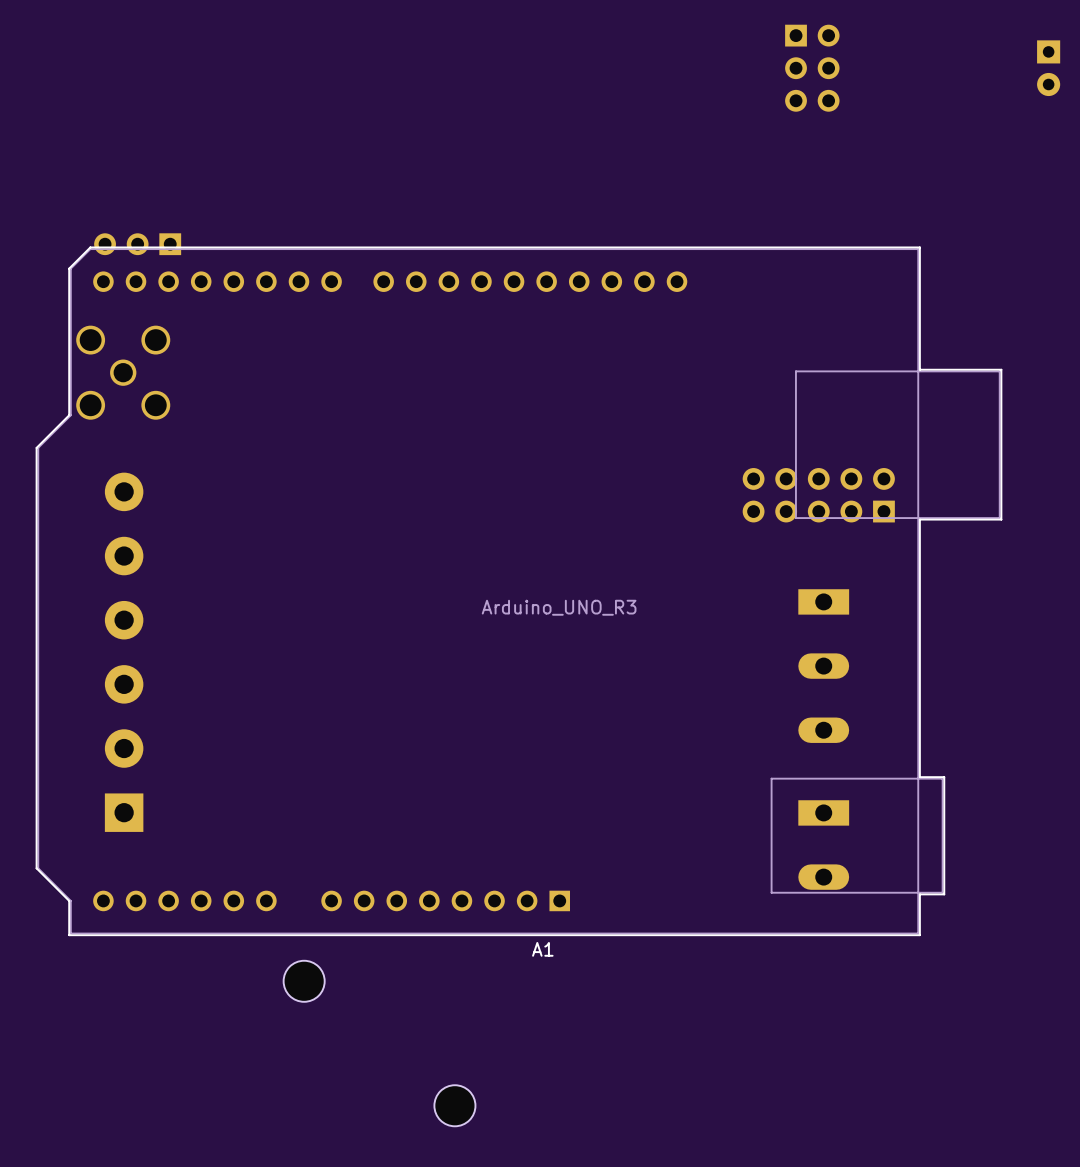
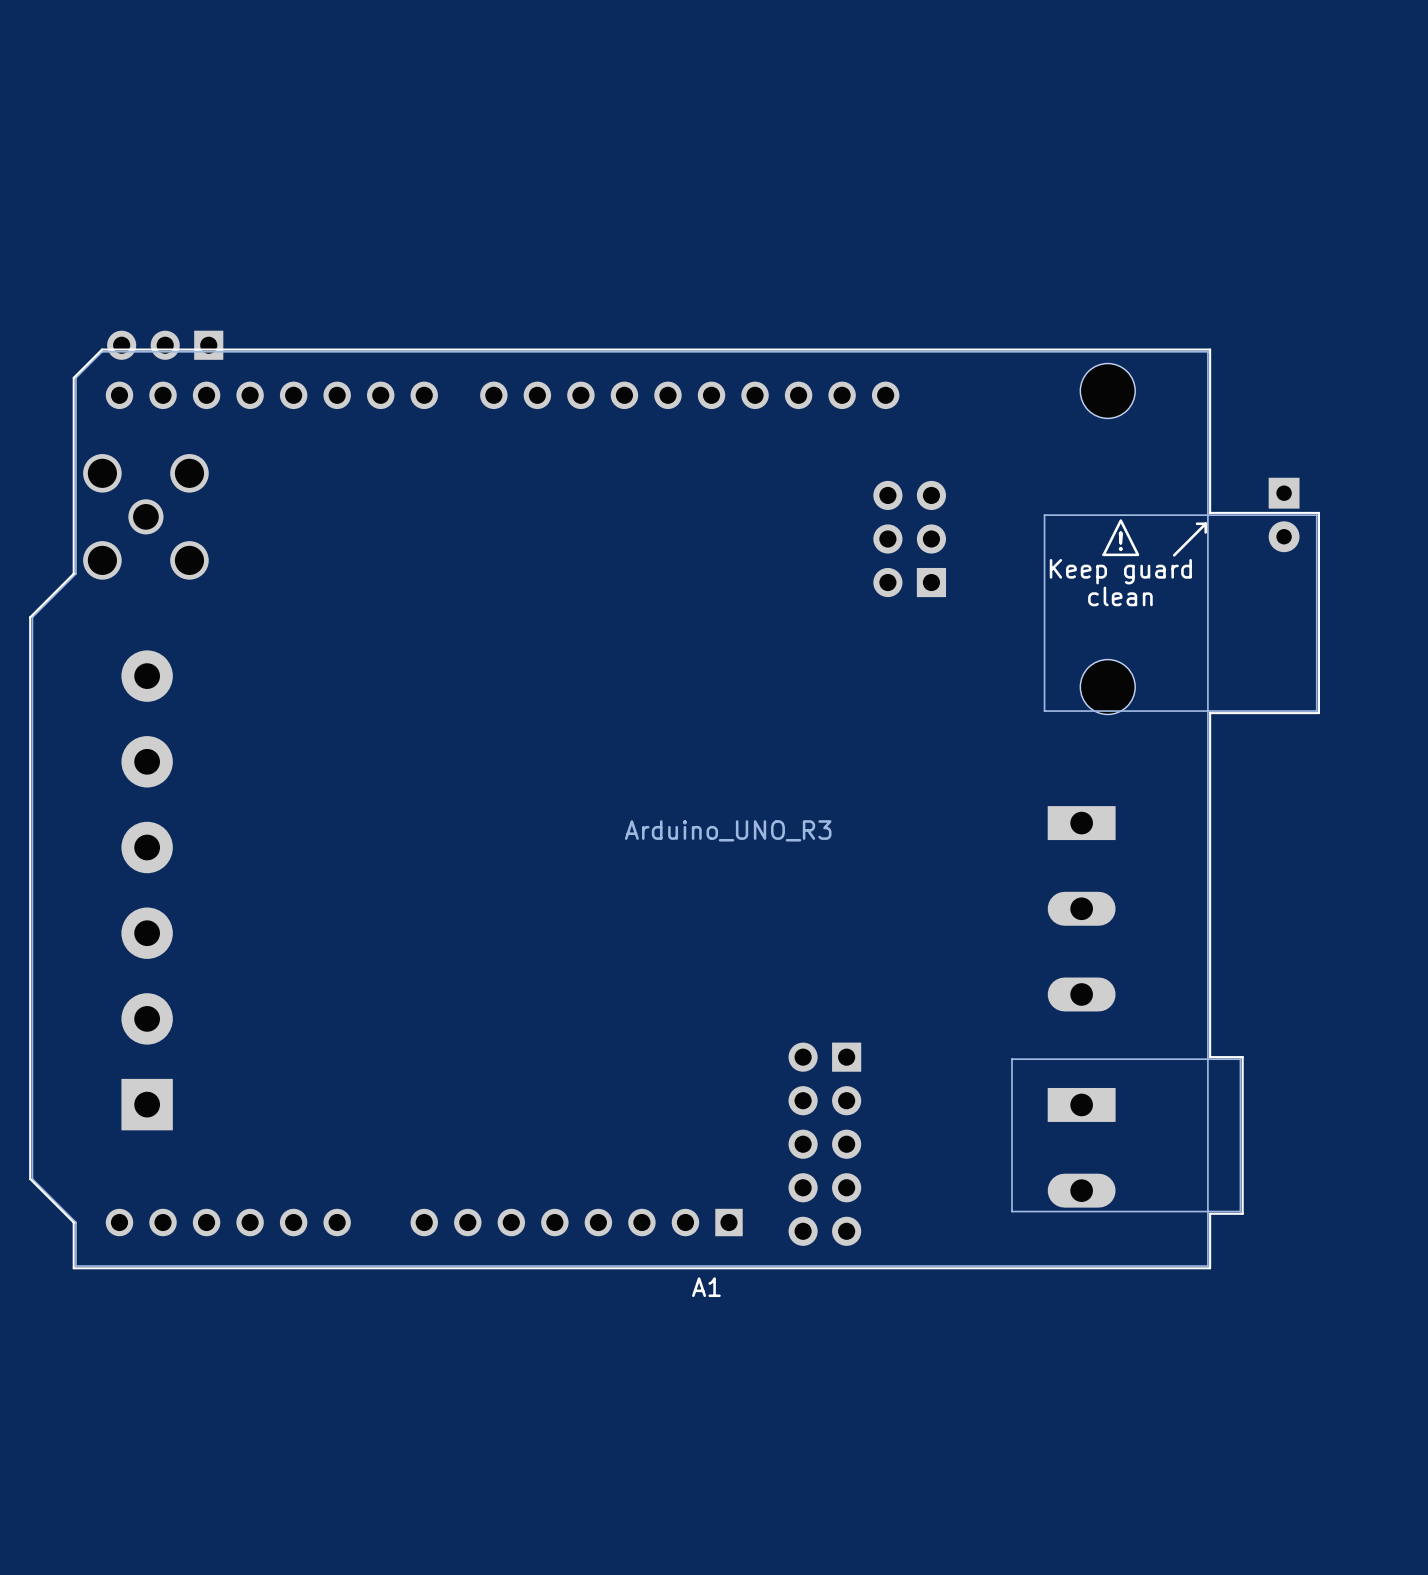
part: (812, 68) -> none
part position: (1048, 68) -> (1284, 514)
part: none -> (1107, 390)
line: none -> (1205, 523) (1174, 555)
line: none -> (1205, 523) (1205, 532)
line: none -> (1205, 523) (1197, 523)
text: none -> Δ (1120, 537)
part: none -> (909, 538)
text: none -> ! (1120, 541)
text: none -> Keep guard (1120, 571)
text: none -> clean (1120, 596)
part: (818, 495) -> none
part: none -> (1107, 687)
part: none -> (824, 1144)
part: (304, 981) -> none
part: (454, 1105) -> none

